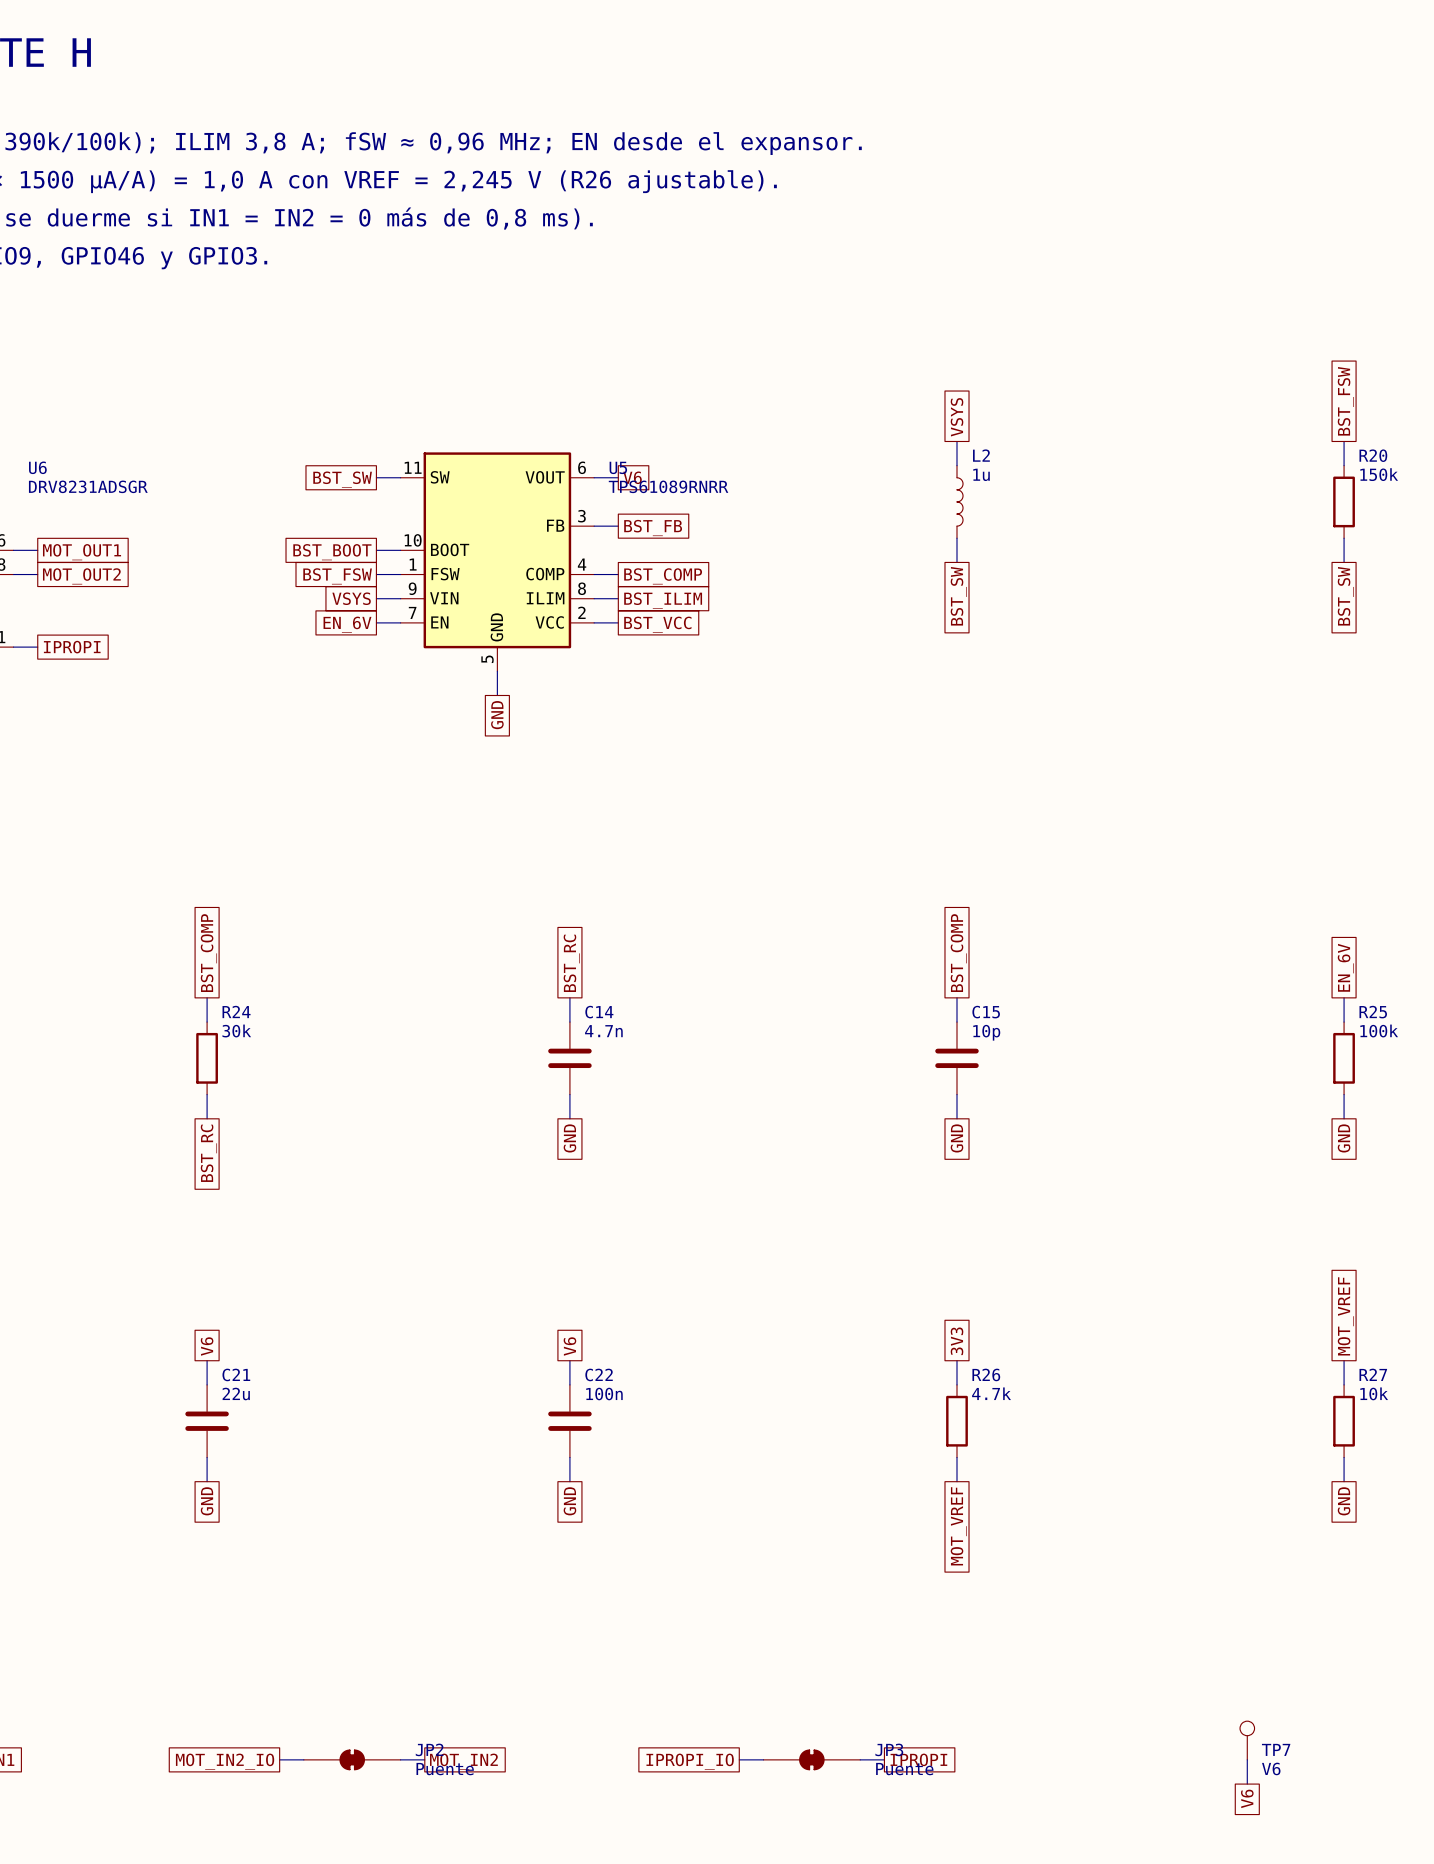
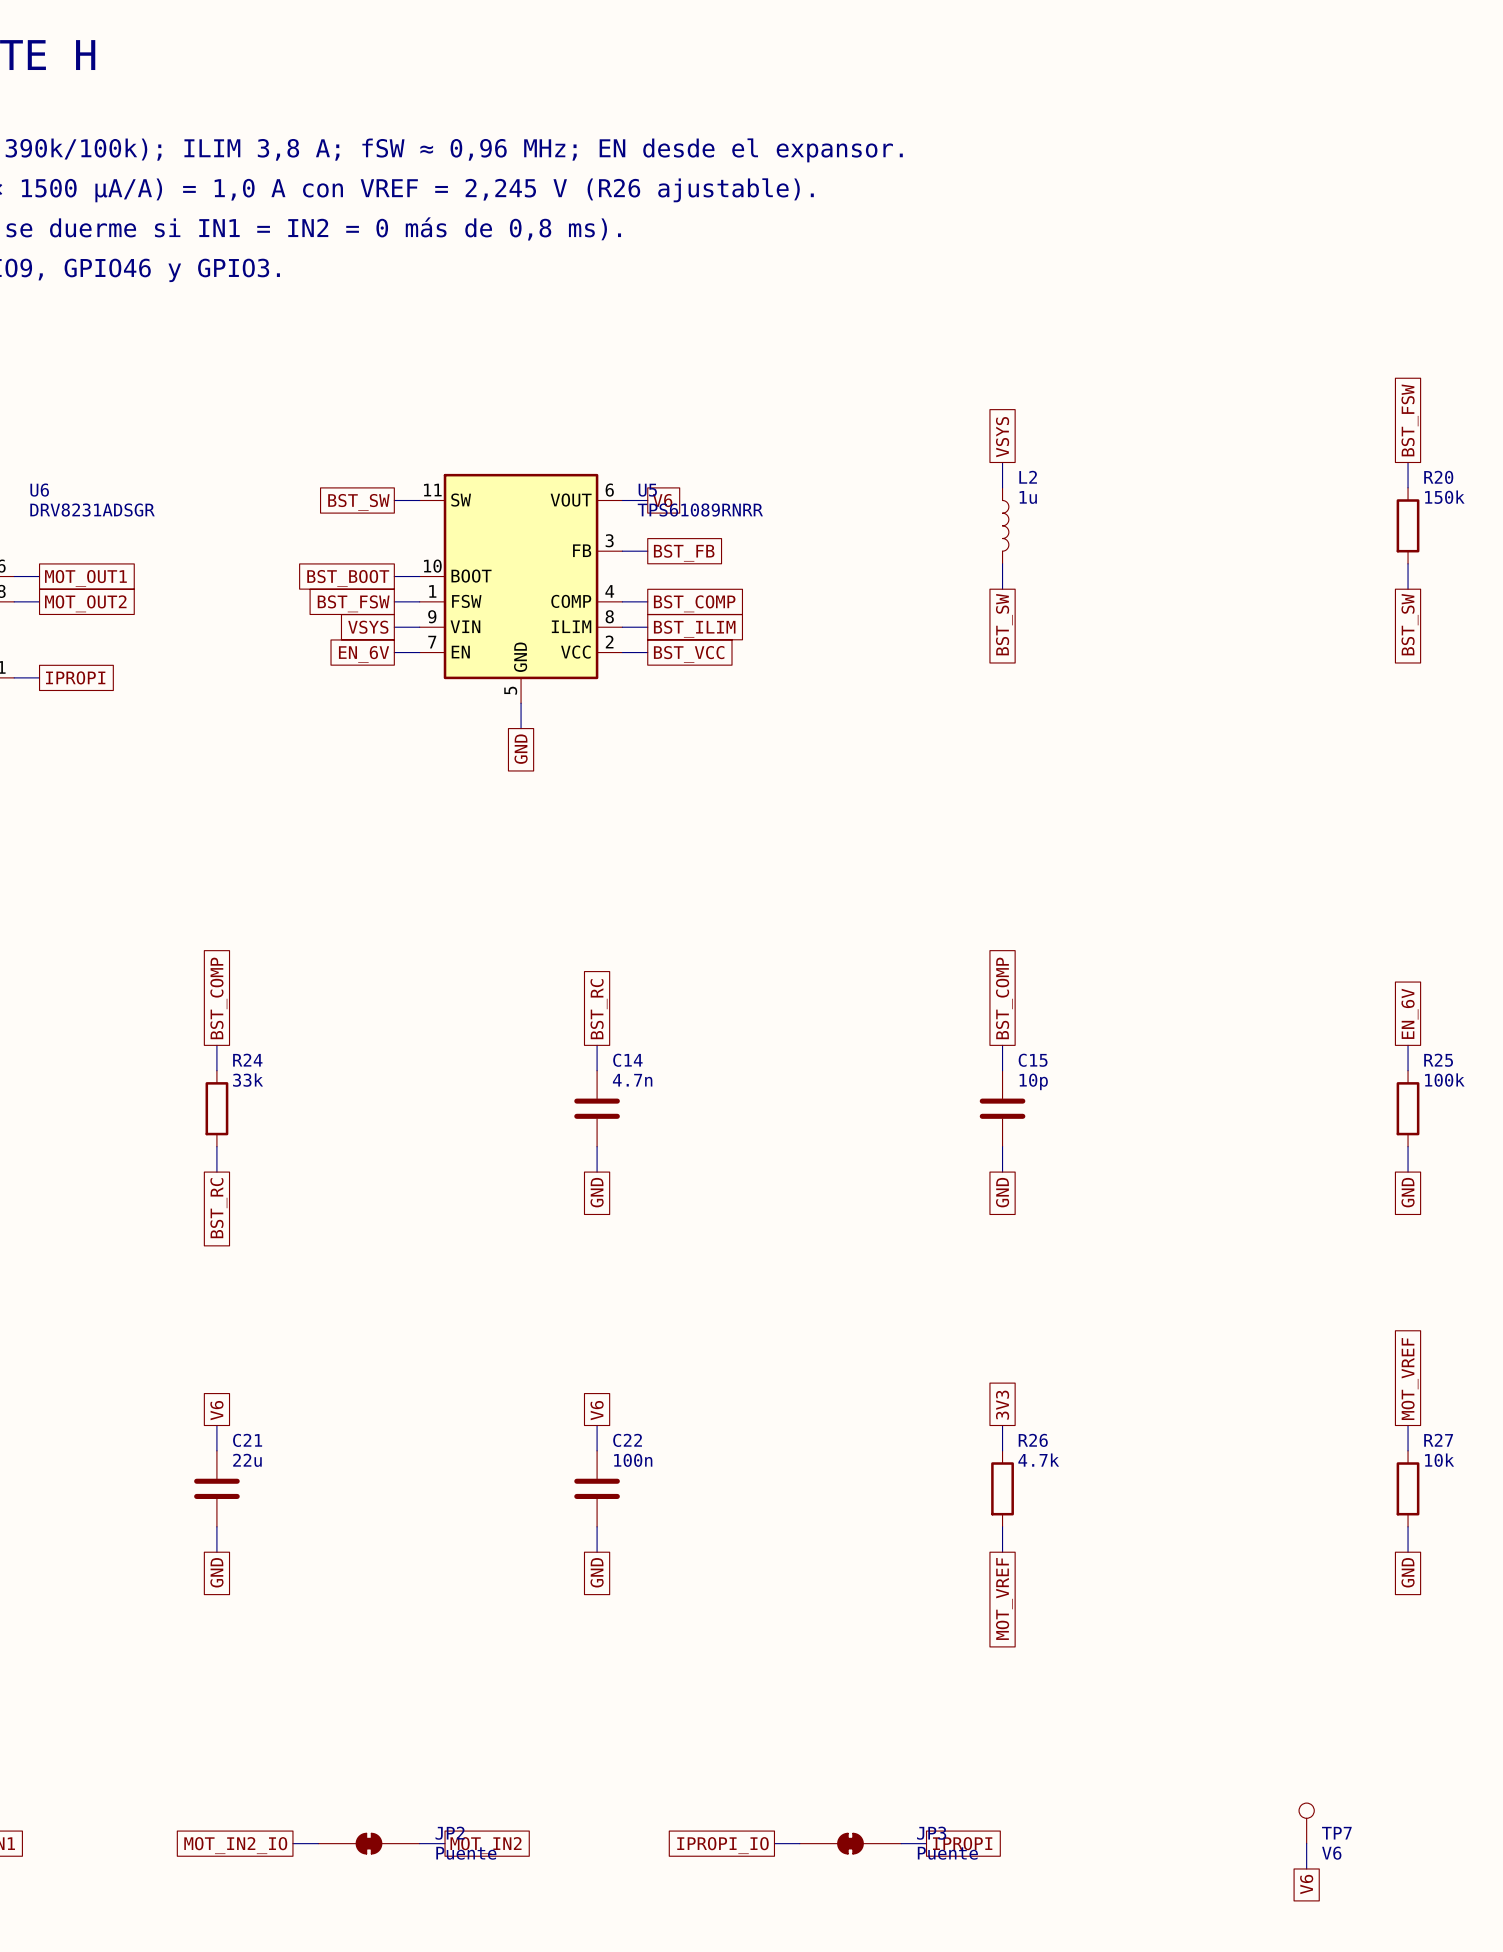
R24 value: 30k (236, 1030) -> 33k (248, 1080)

